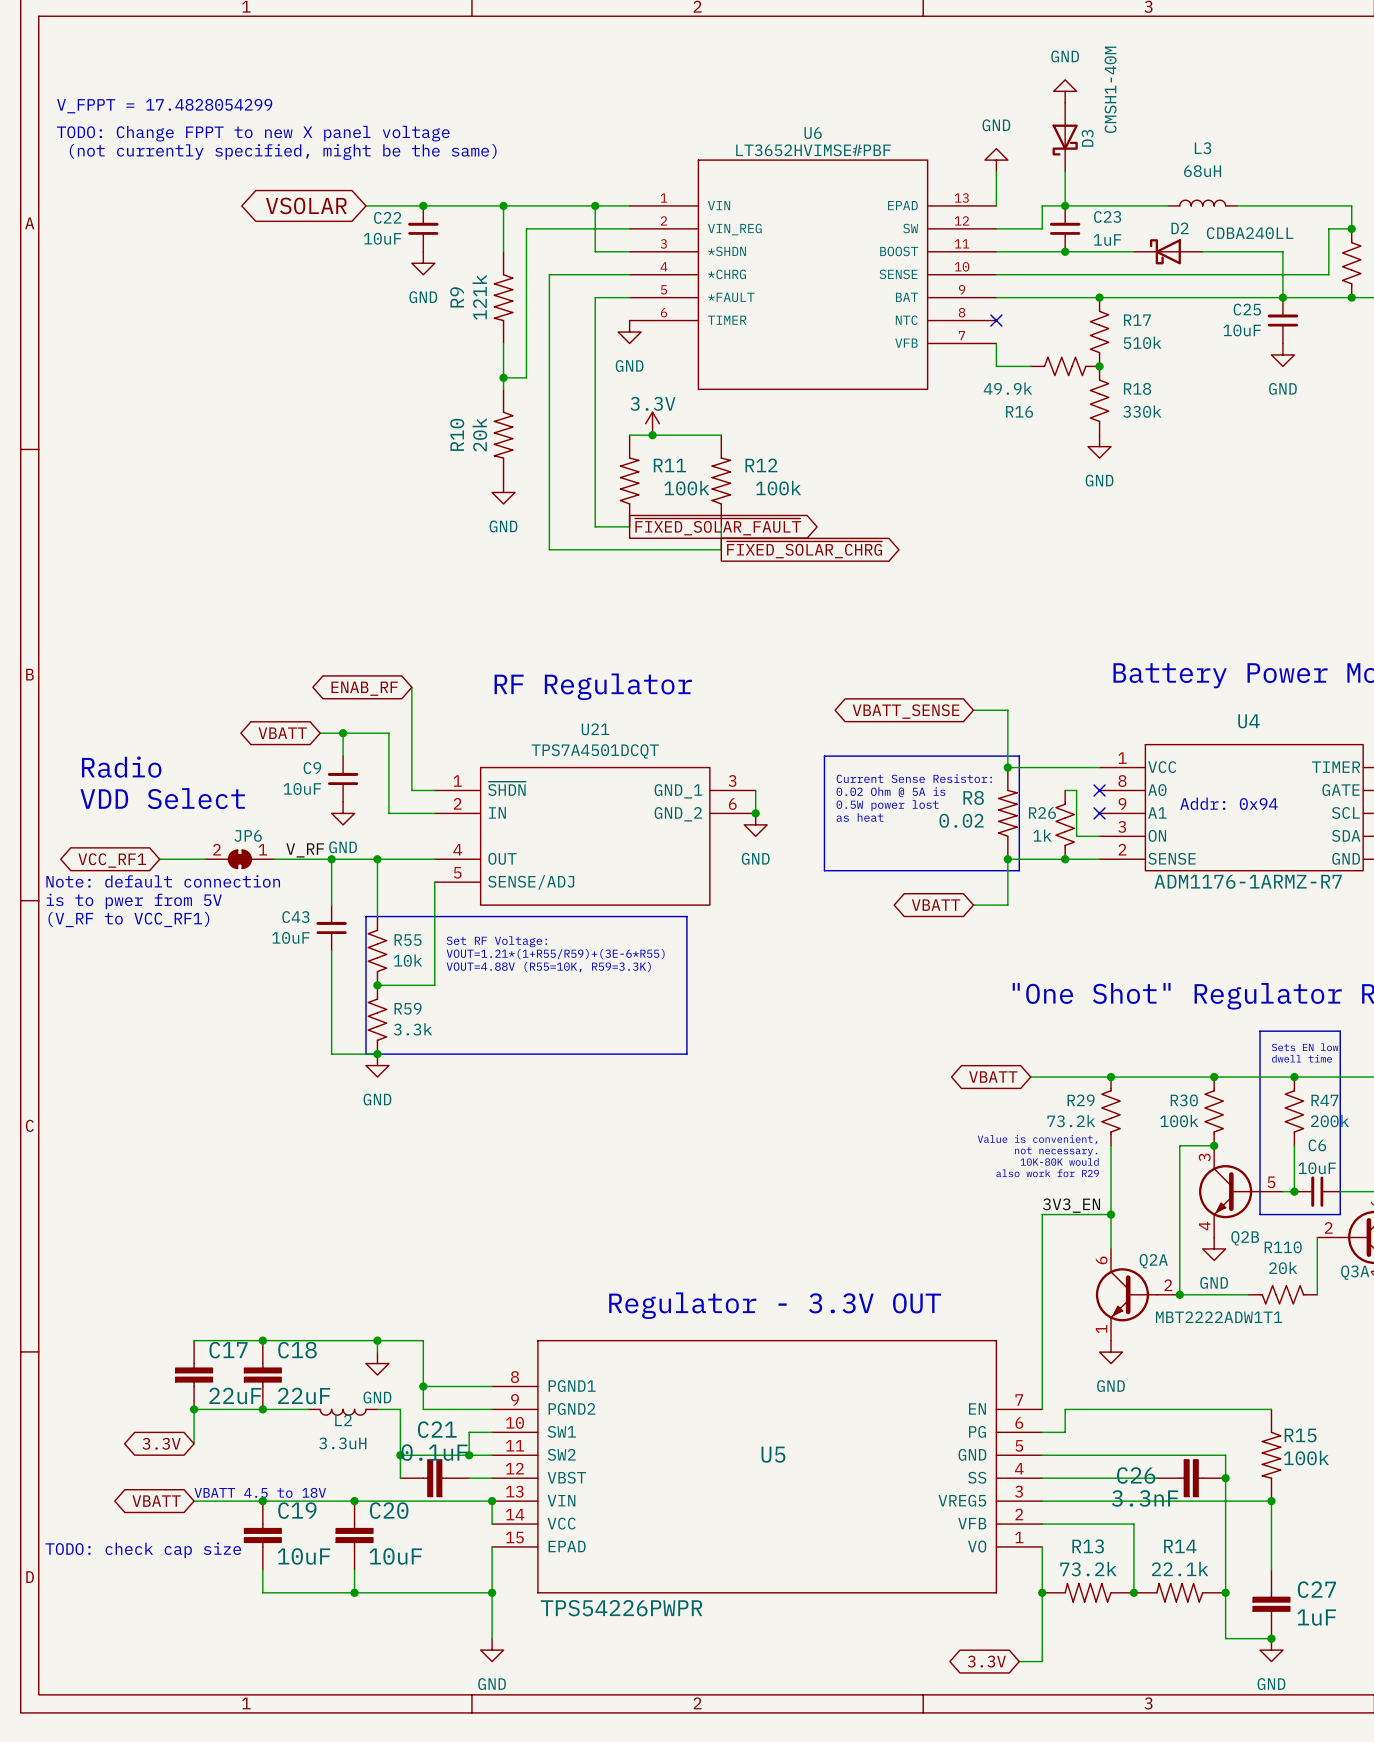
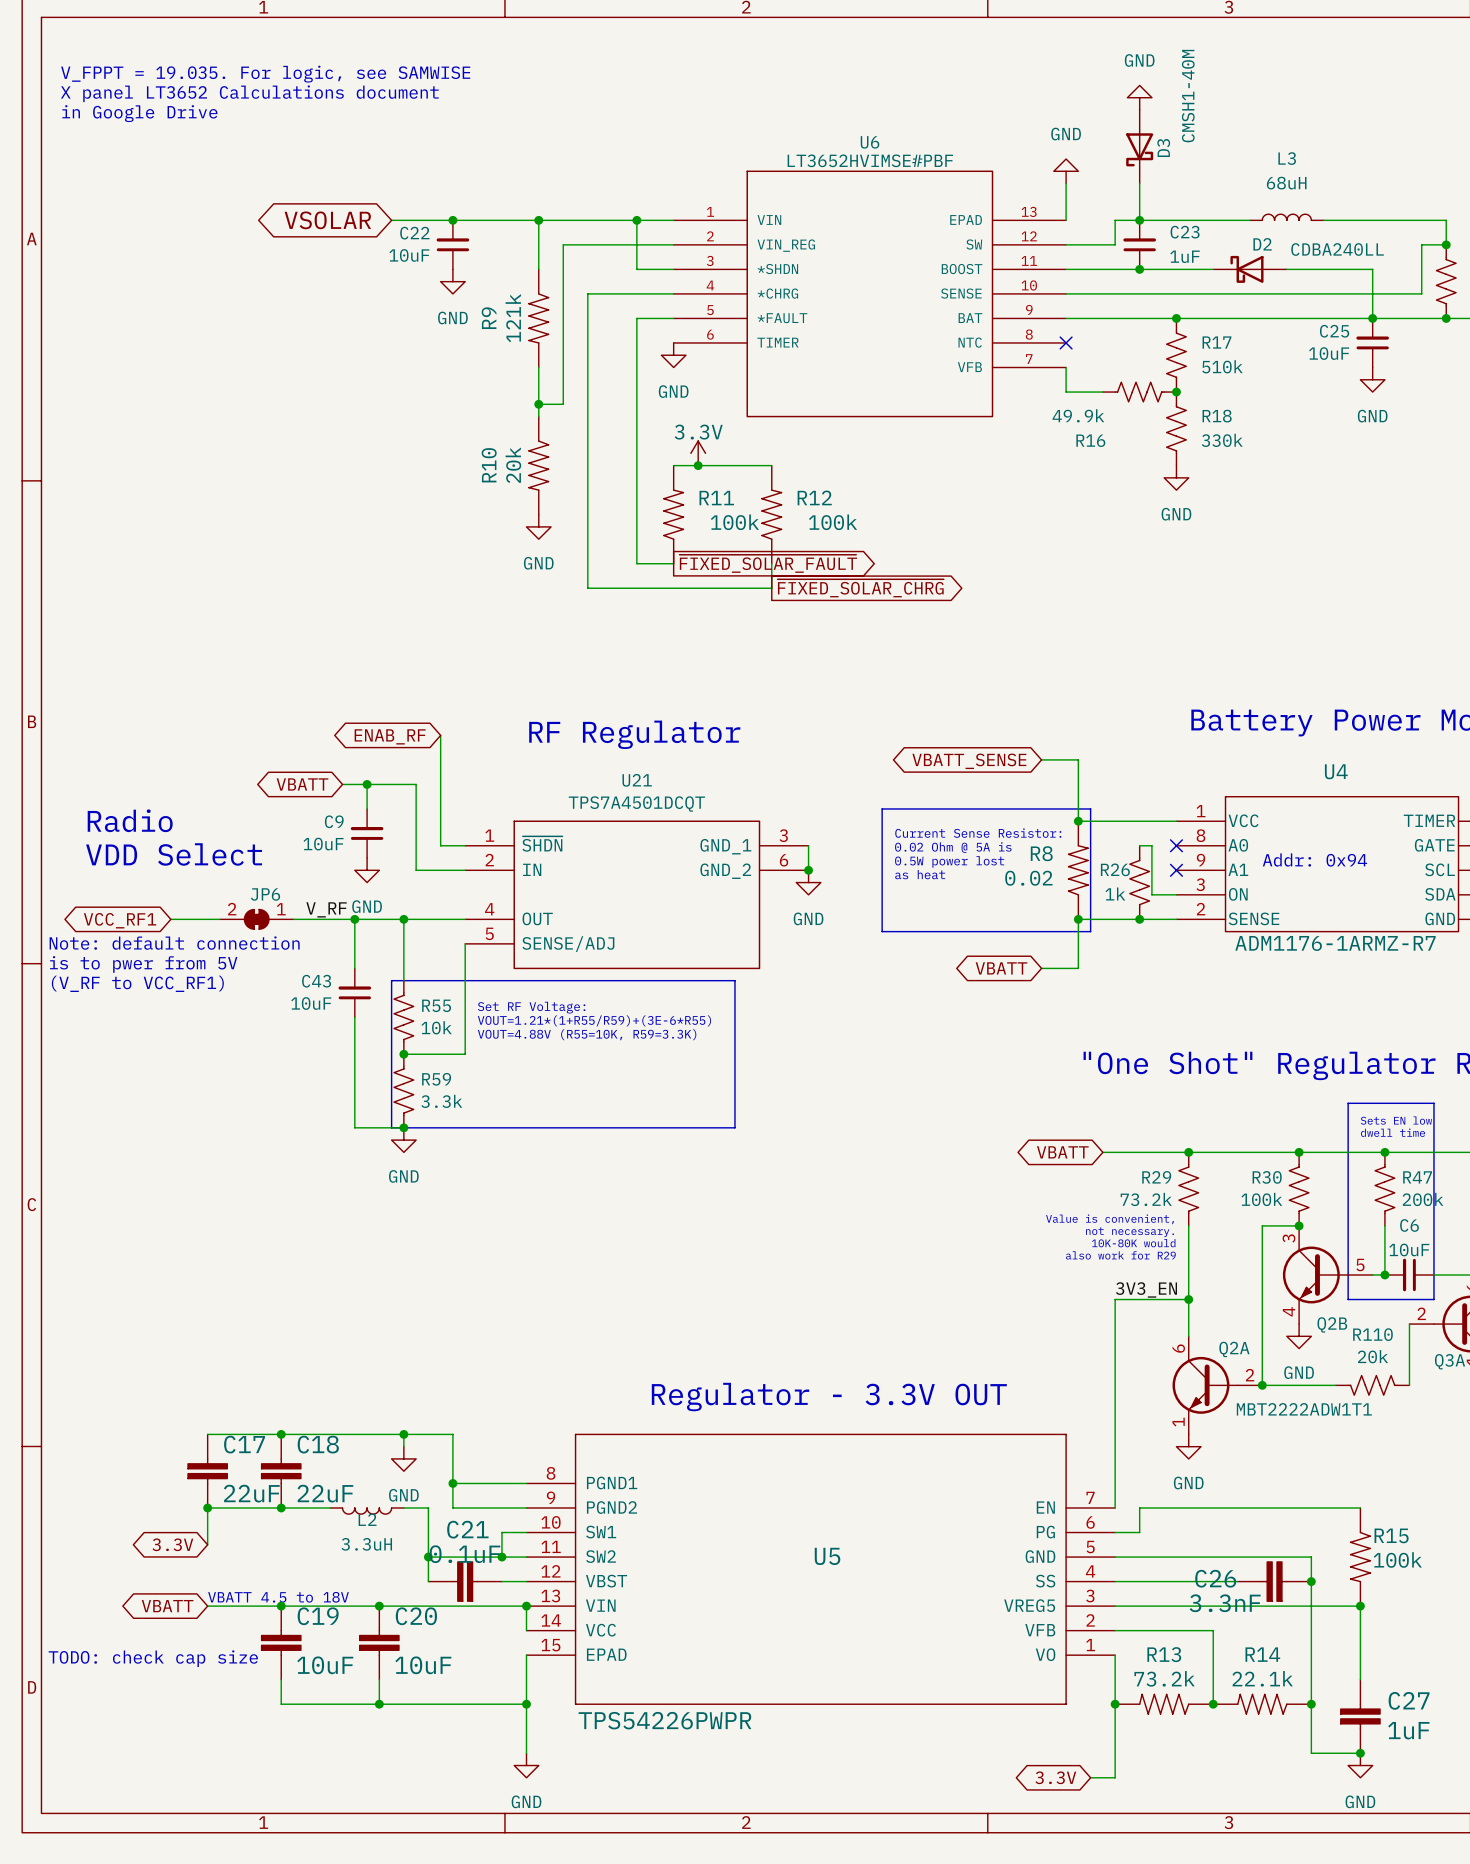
text: none -> V_FPPT = 19.035. For logic, see SAMWISE (265, 74)
text: none -> X panel LT3652 Calculations document (249, 93)
text: V_FPPT = 17.4828054299 (164, 106) -> in Google Drive (139, 113)
text: TODO: Change FPPT to new X panel voltage (253, 133) -> none
text: (not currently specified, might be the same) (283, 151) -> none

